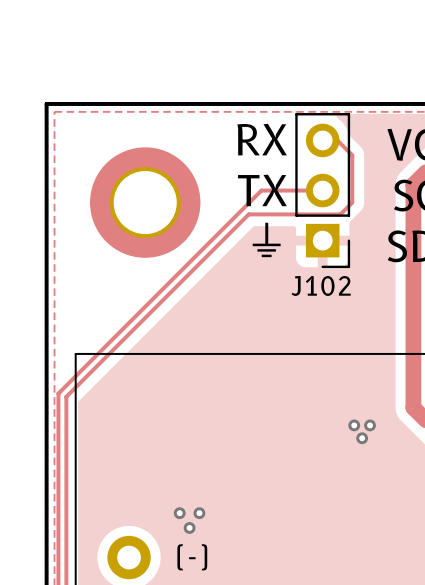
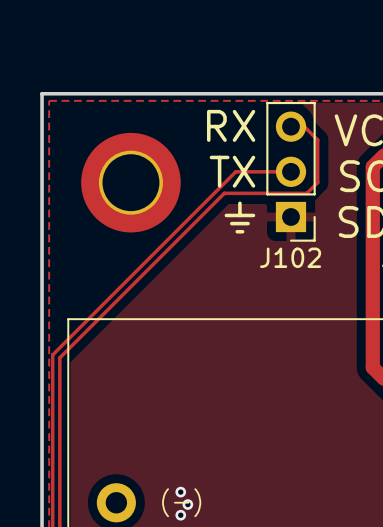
via: (354, 425) -> none
via: (370, 425) -> none
via: (362, 438) -> none
via: (179, 513) -> none
via: (199, 513) -> none
via: (189, 527) -> none
via: none -> (180, 492)
via: none -> (187, 504)
via: none -> (180, 515)

